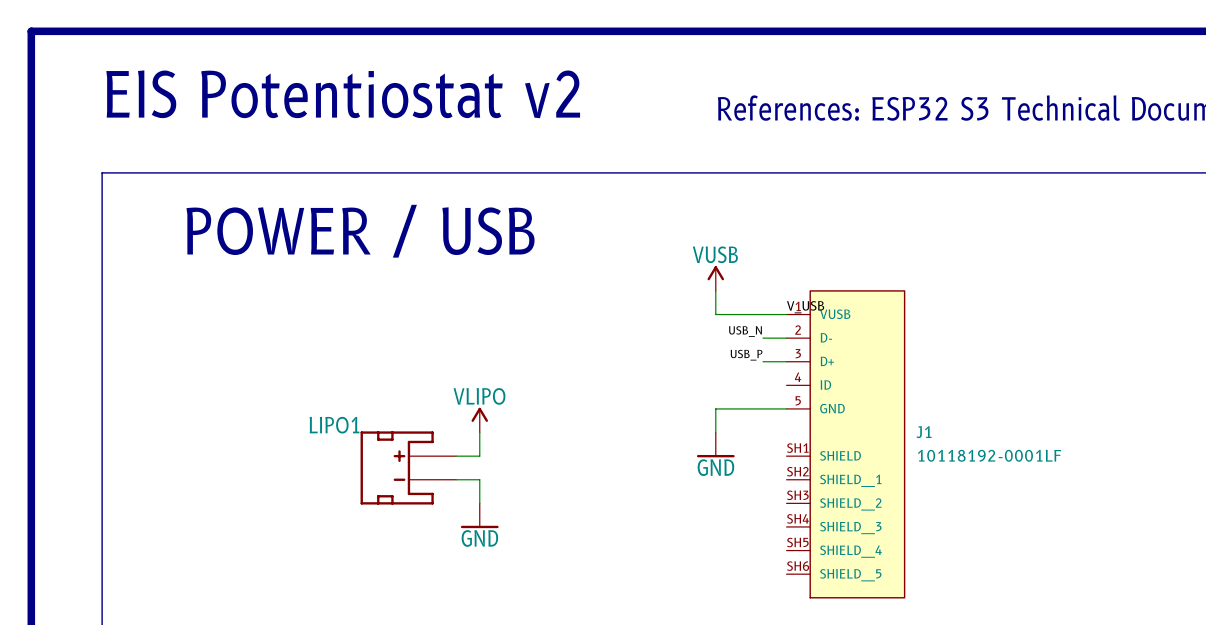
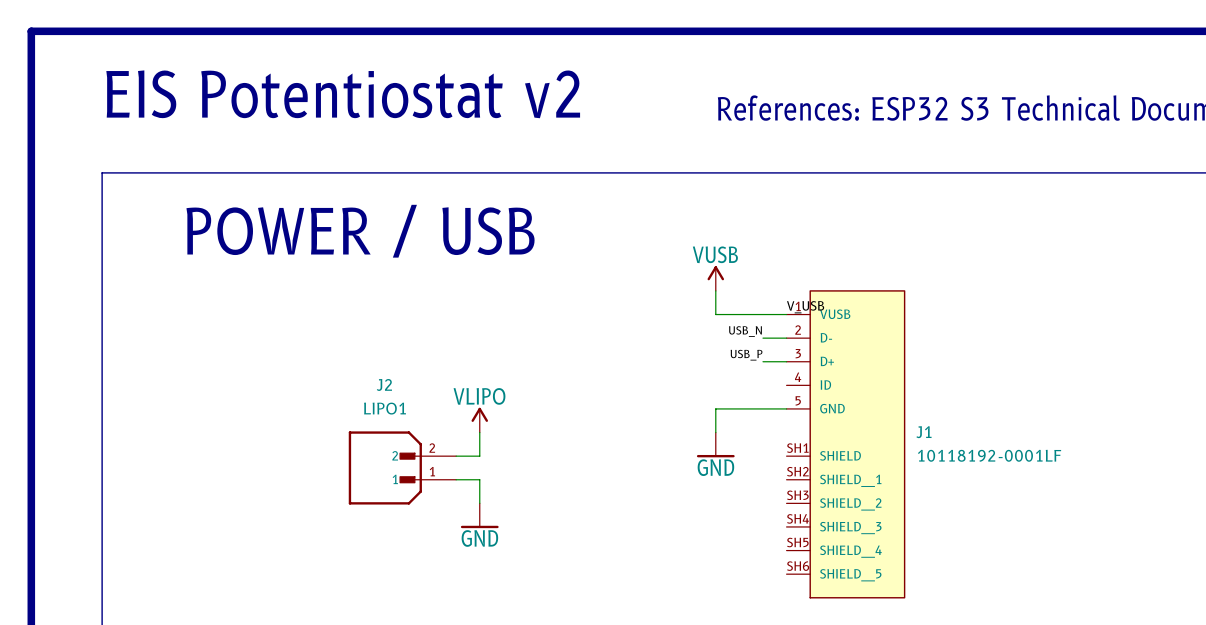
J2: none -> LIPO1 (402, 467)
LIPO1: (408, 467) -> none

